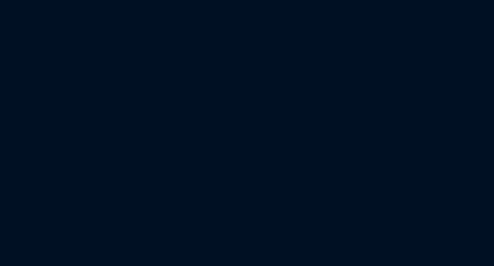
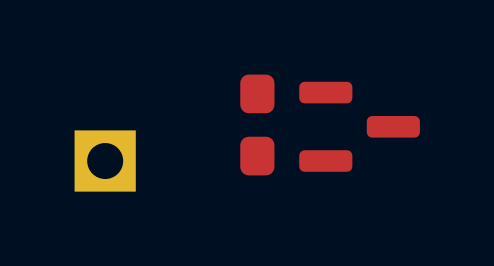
part: none -> (257, 124)
part: none -> (359, 126)
part: none -> (105, 161)

